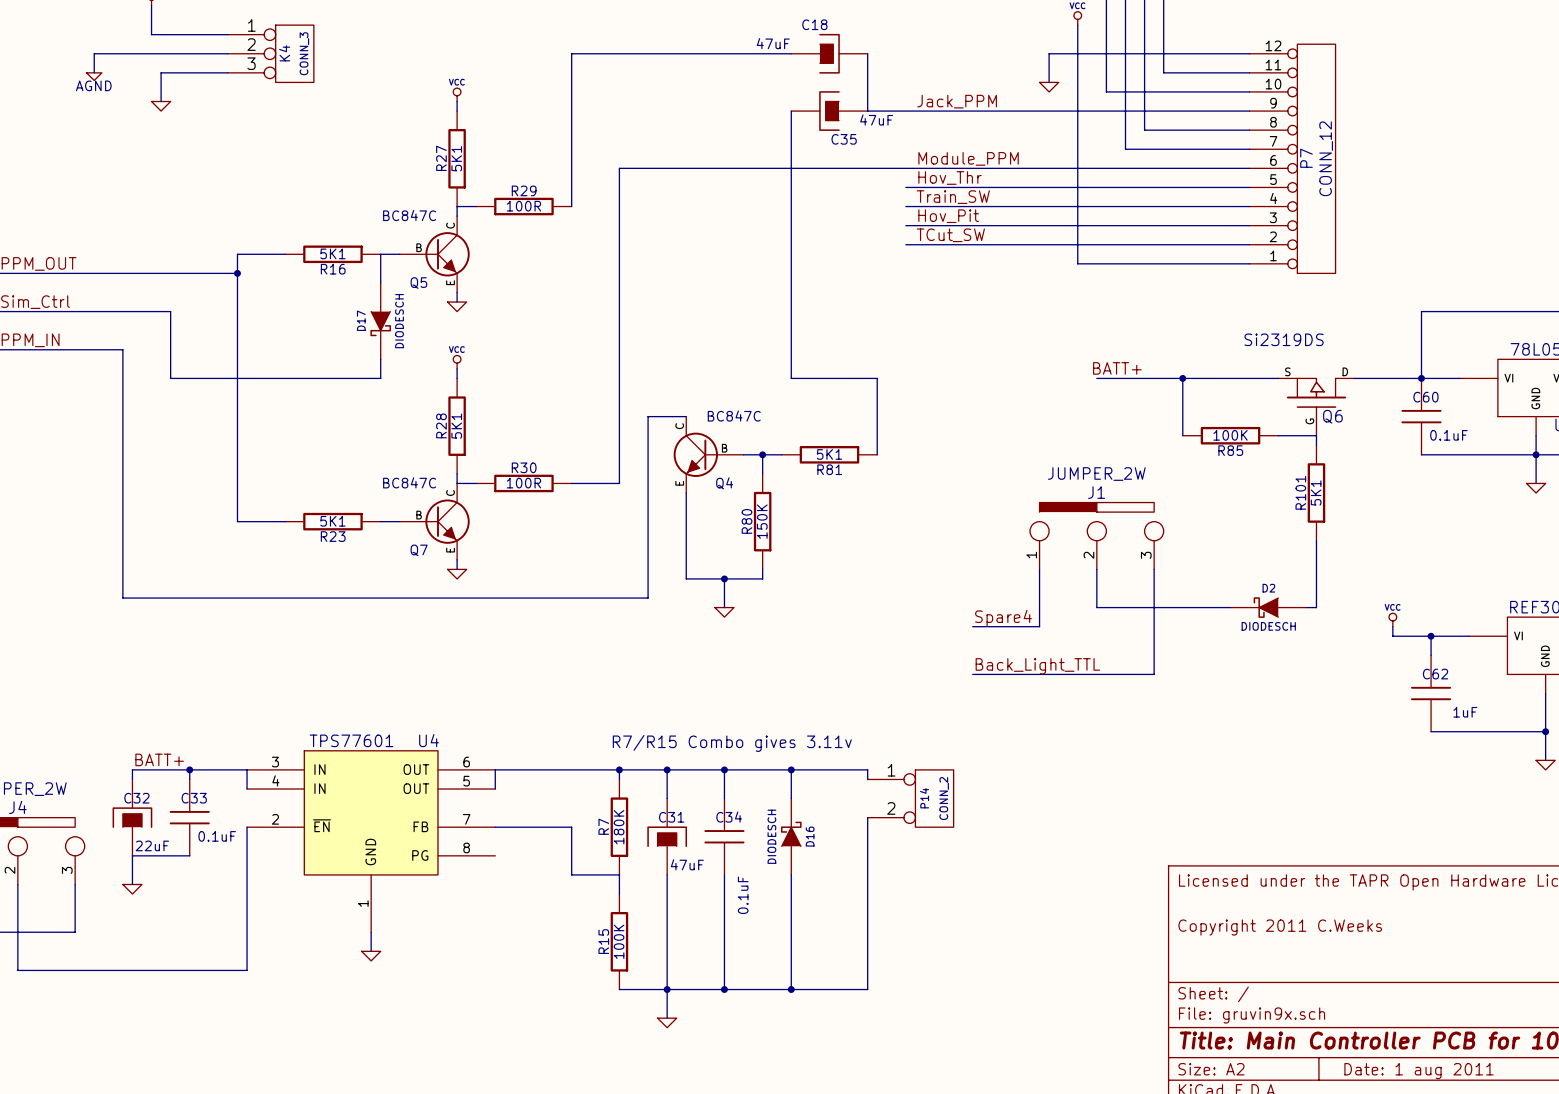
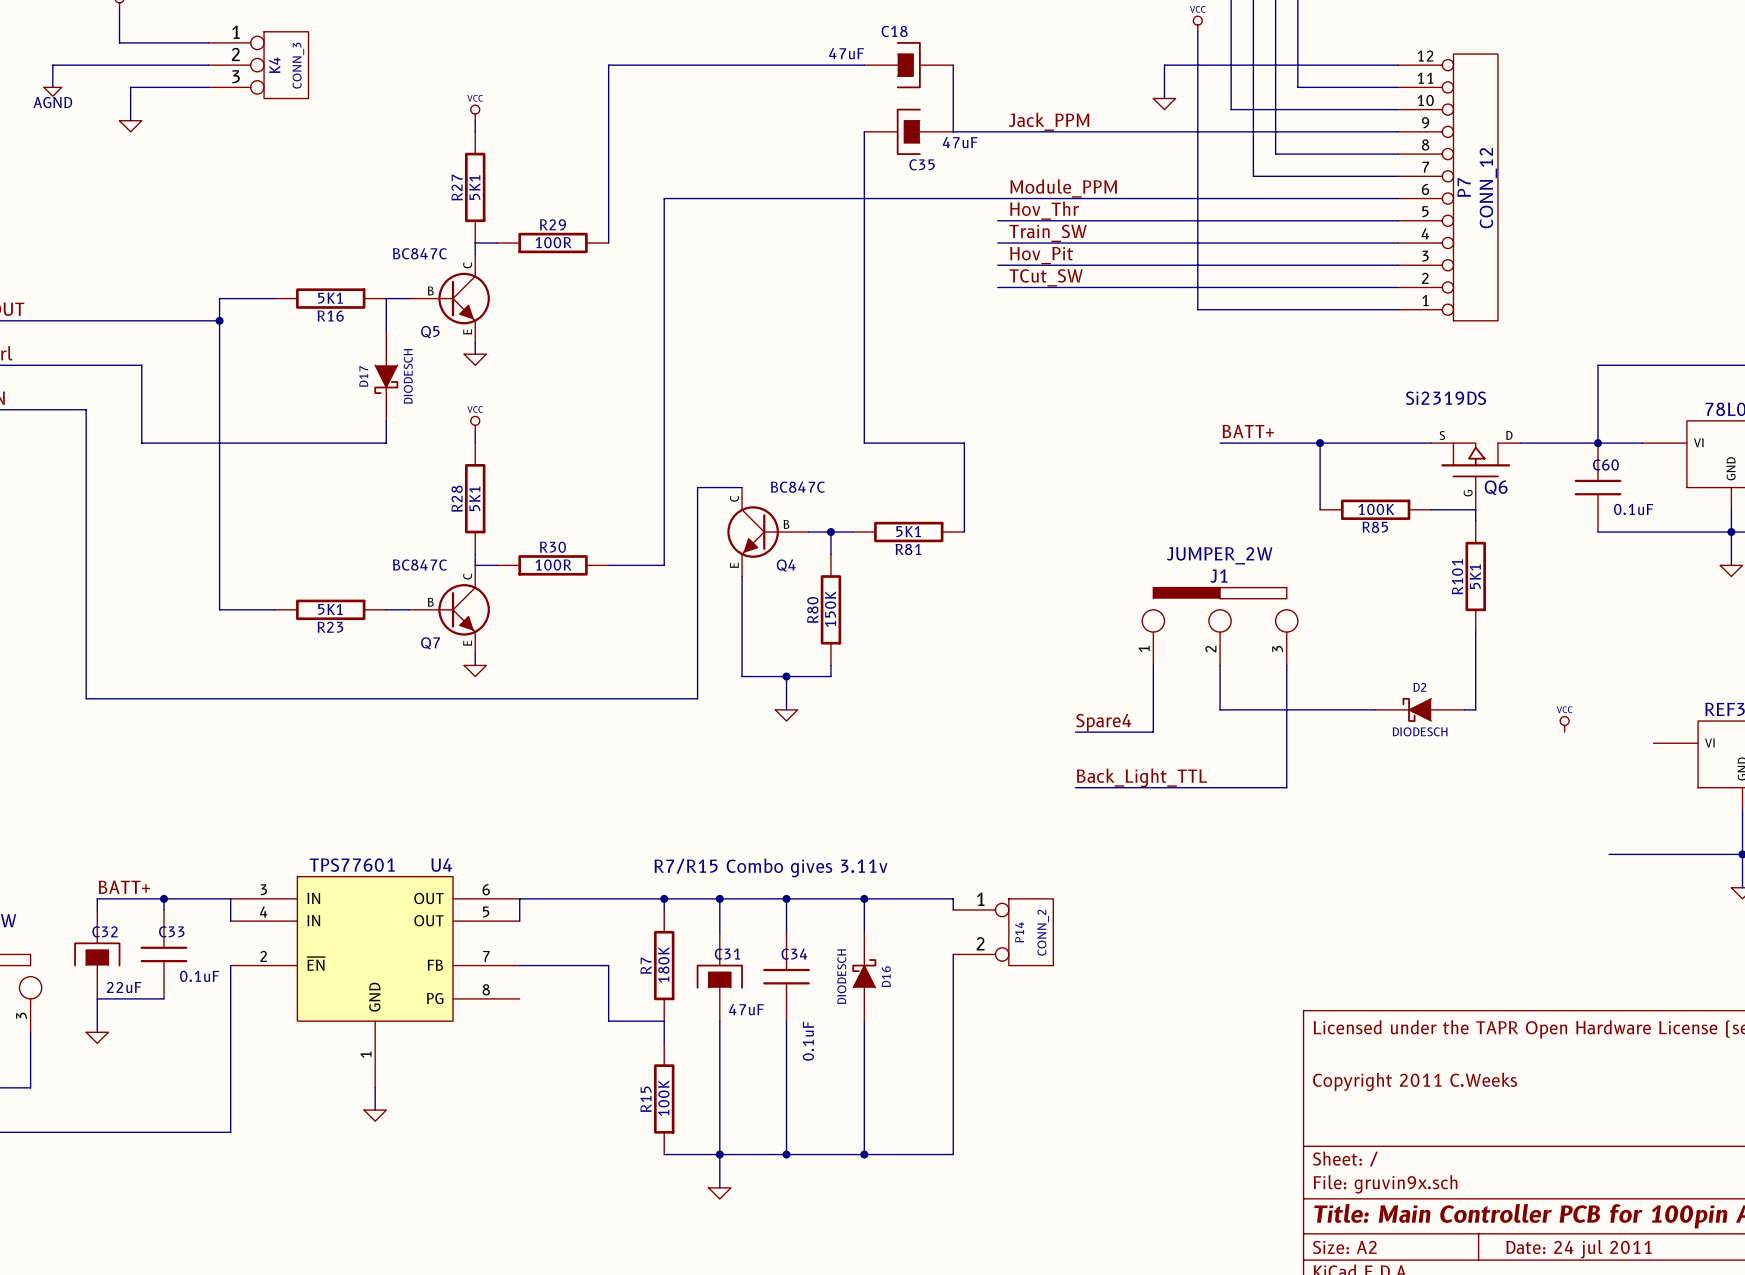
wire: (1392, 626) (1392, 636) (1469, 636) -> none
wire: (1431, 636) (1431, 655) -> none
junction: (1431, 636) -> none
C62: 1uF (1431, 693) -> none
title block: Date: 1 aug 2011 (1419, 1071) -> Date: 24 jul 2011 (1579, 1249)

